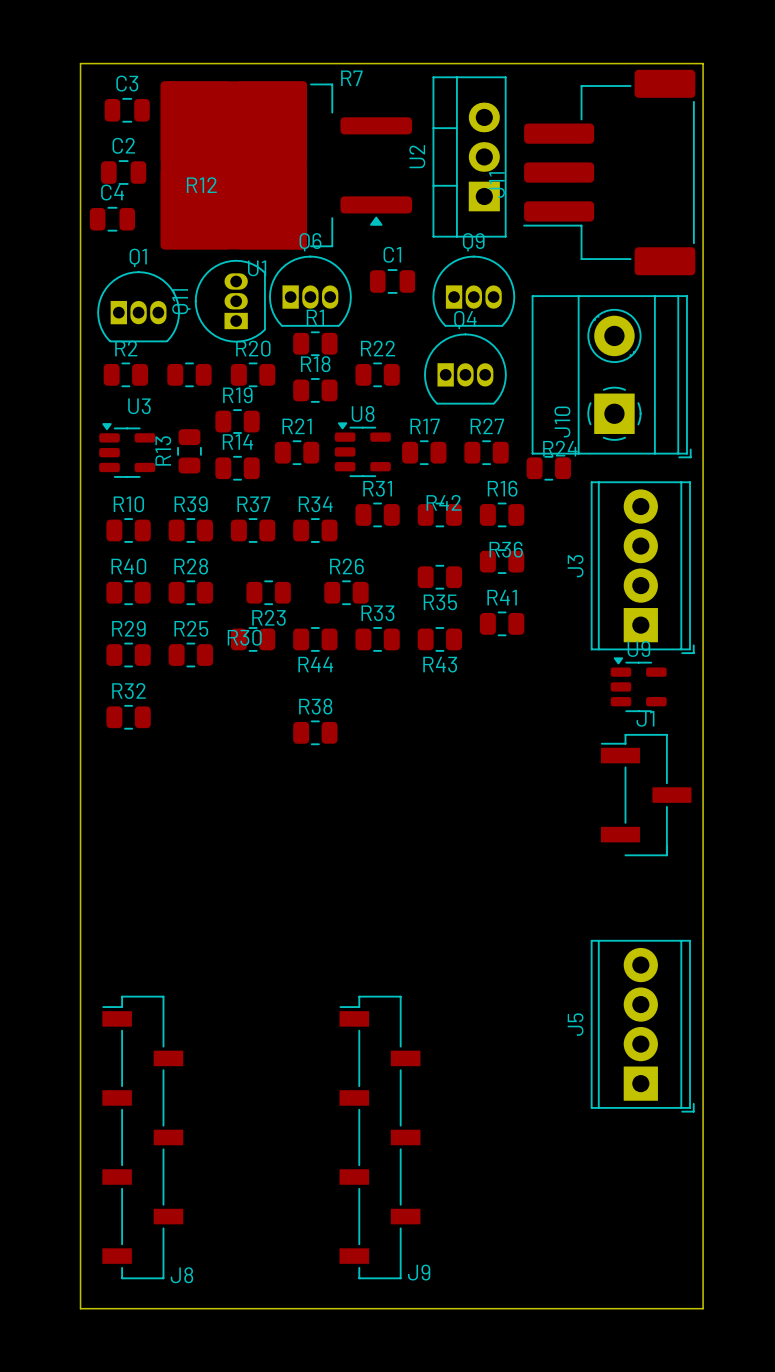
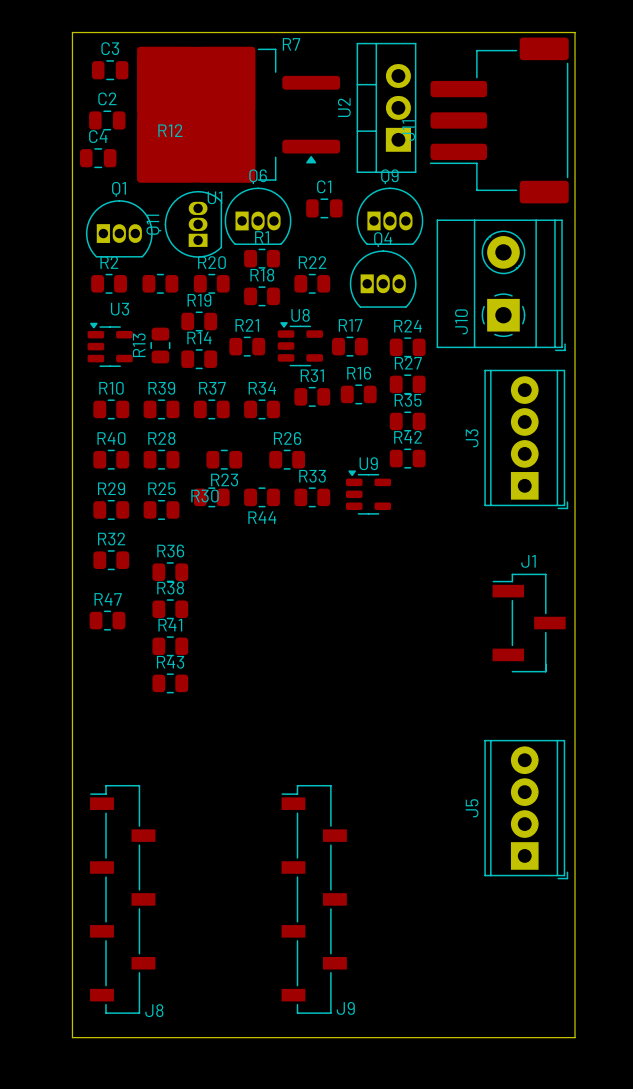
R24 name position: R24 (560, 448) -> R24 (407, 326)
R27 position: (486, 452) -> (407, 384)
R24 position: (548, 468) -> (407, 347)
R42 name position: R42 (443, 502) -> R42 (408, 437)
R42 position: (439, 514) -> (407, 458)
R16 position: (502, 514) -> (358, 394)
R36 name position: R36 (506, 549) -> R36 (170, 551)
R36 position: (502, 561) -> (170, 572)
R35 position: (439, 577) -> (407, 421)
R35 name position: R35 (440, 602) -> R35 (408, 400)
R41 position: (502, 623) -> (170, 646)
R43 position: (439, 639) -> (170, 683)
R43 name position: R43 (440, 664) -> R43 (170, 662)
U9 position: (638, 684) -> (368, 492)
R38 position: (315, 732) -> (170, 609)
R47: none -> (107, 620)

